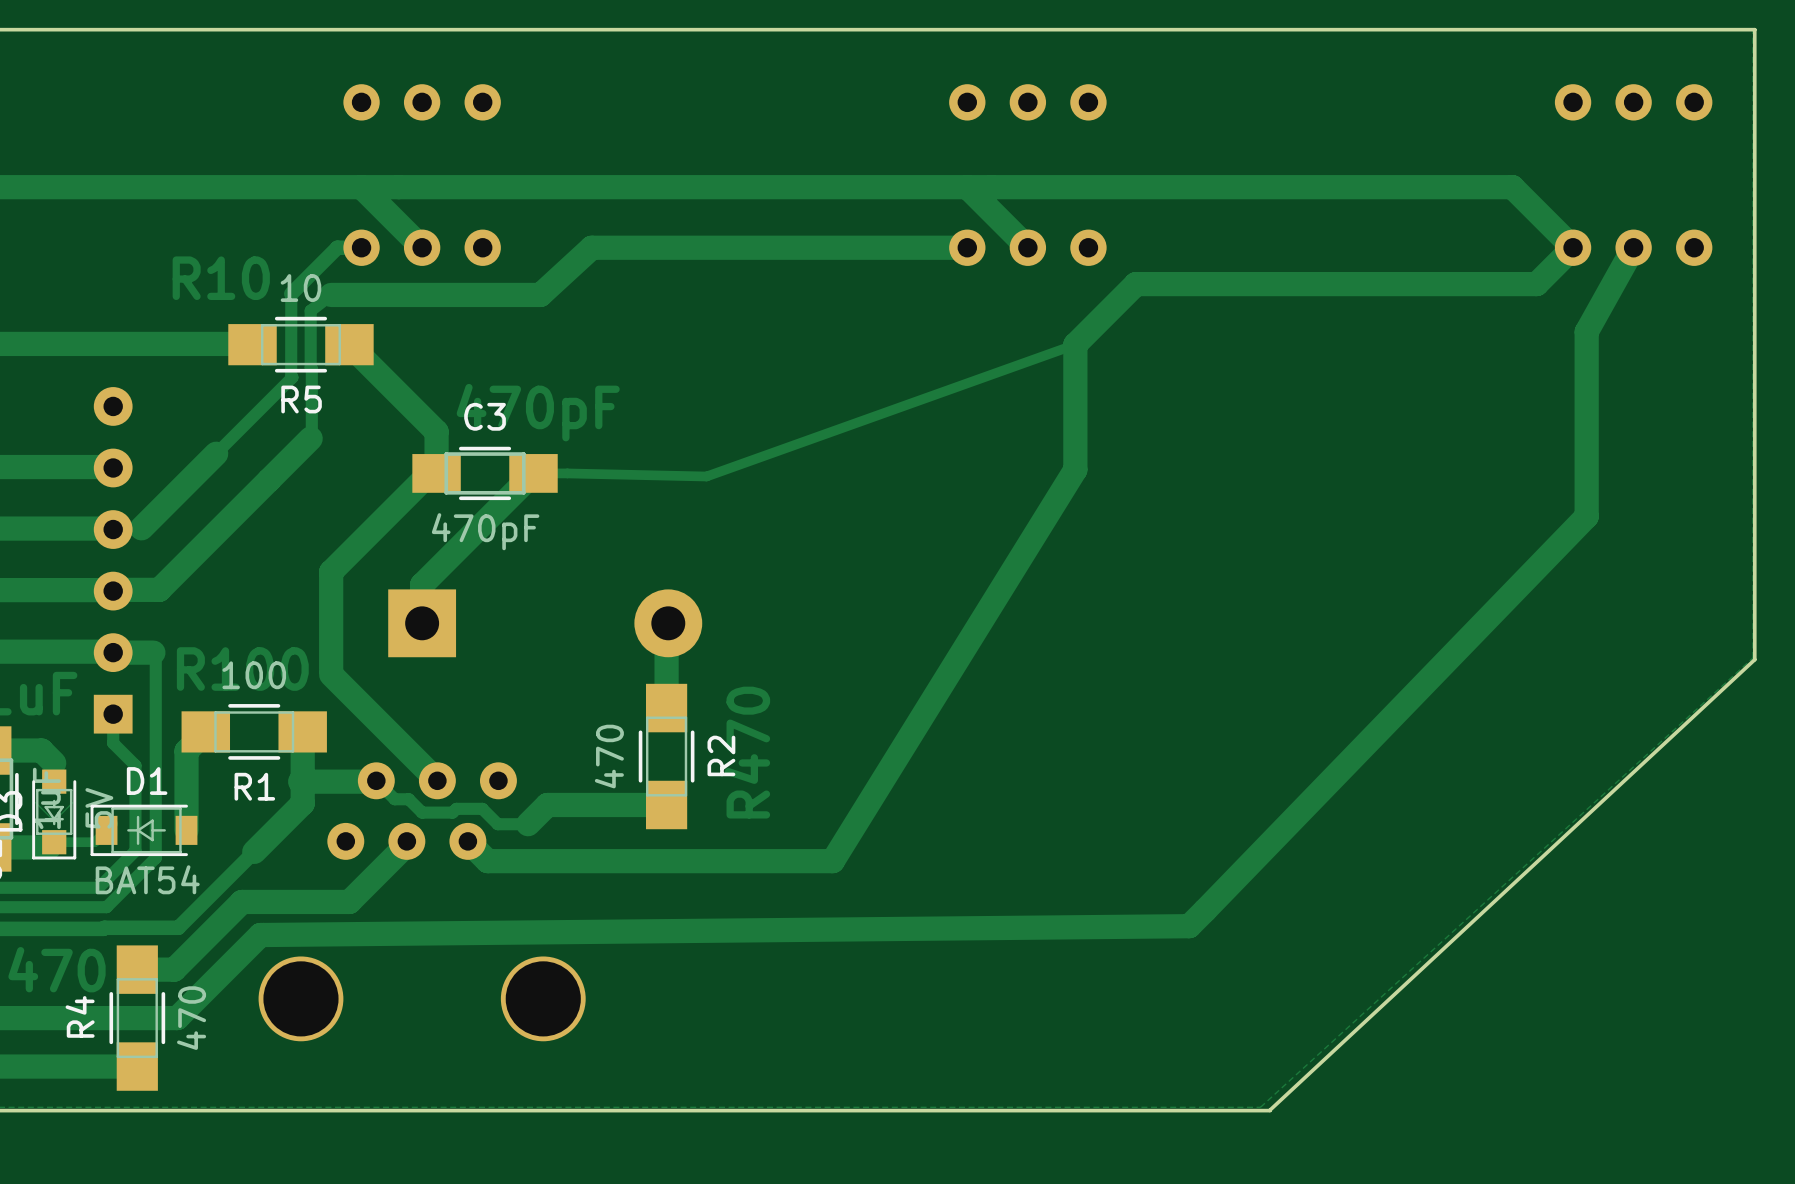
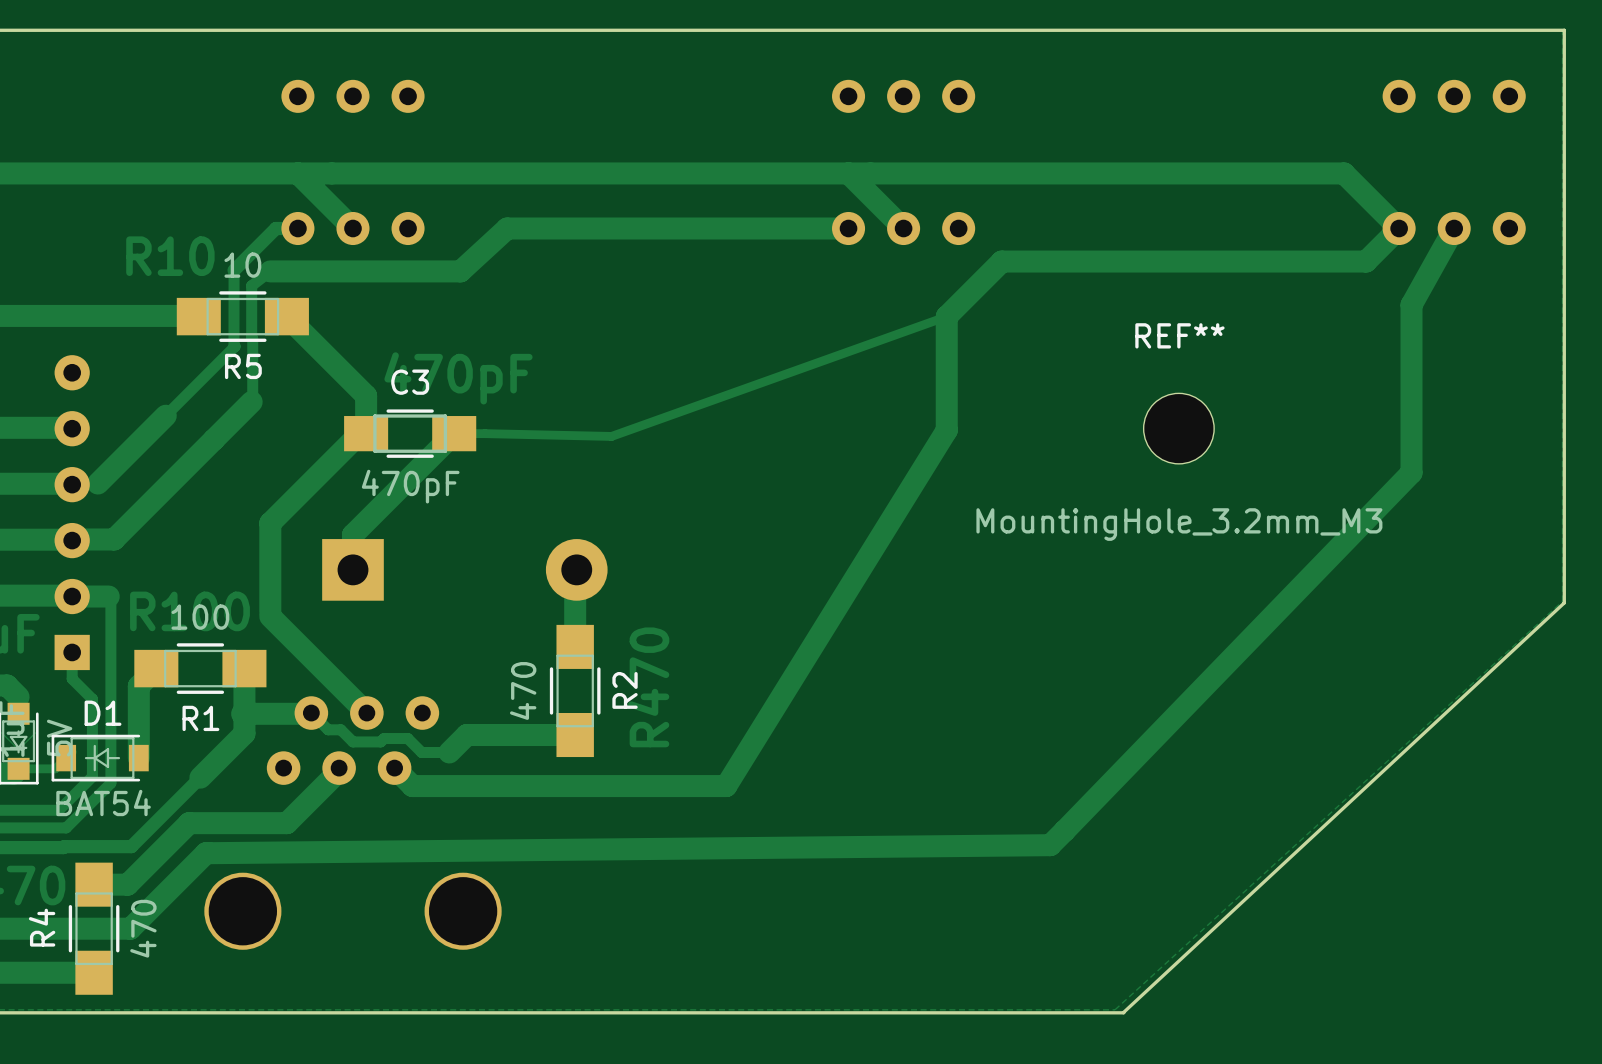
REF**: none -> MountingHole_3.2mm_M3 (1178, 428)

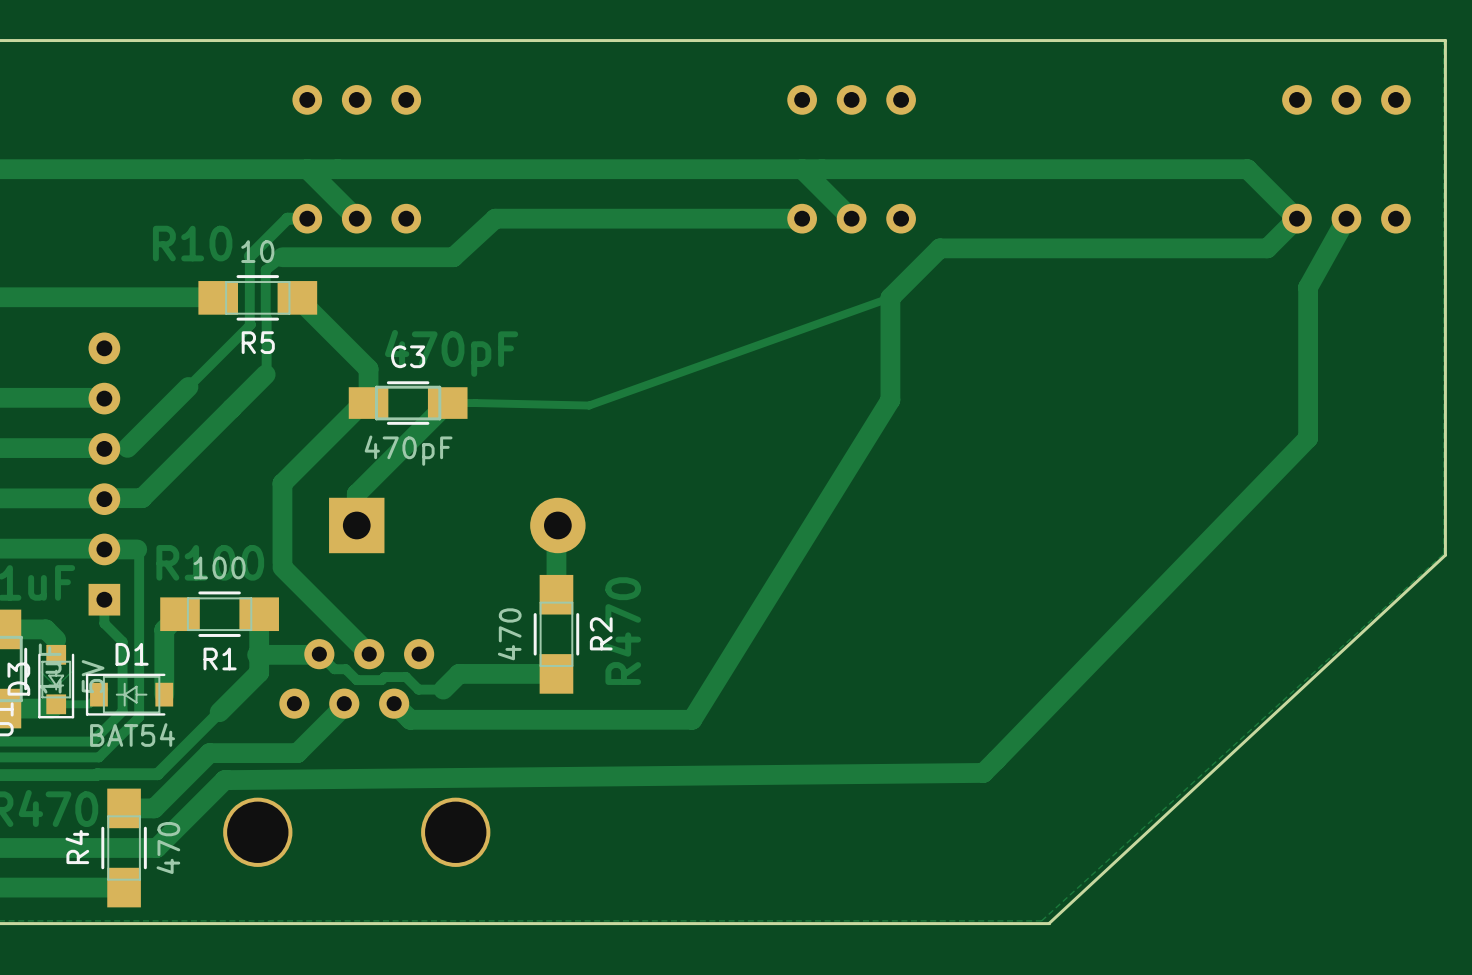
REF**: MountingHole_3.2mm_M3 (1178, 428) -> none

